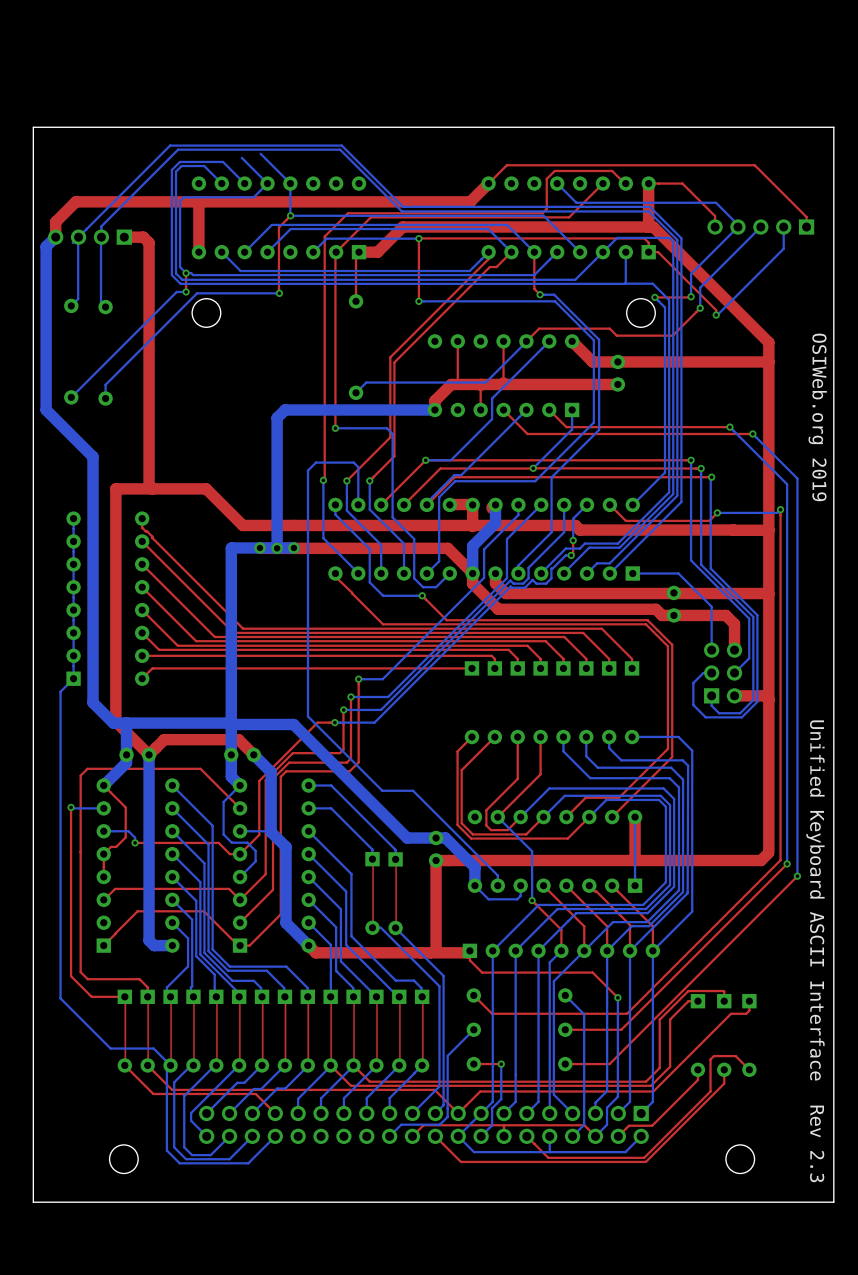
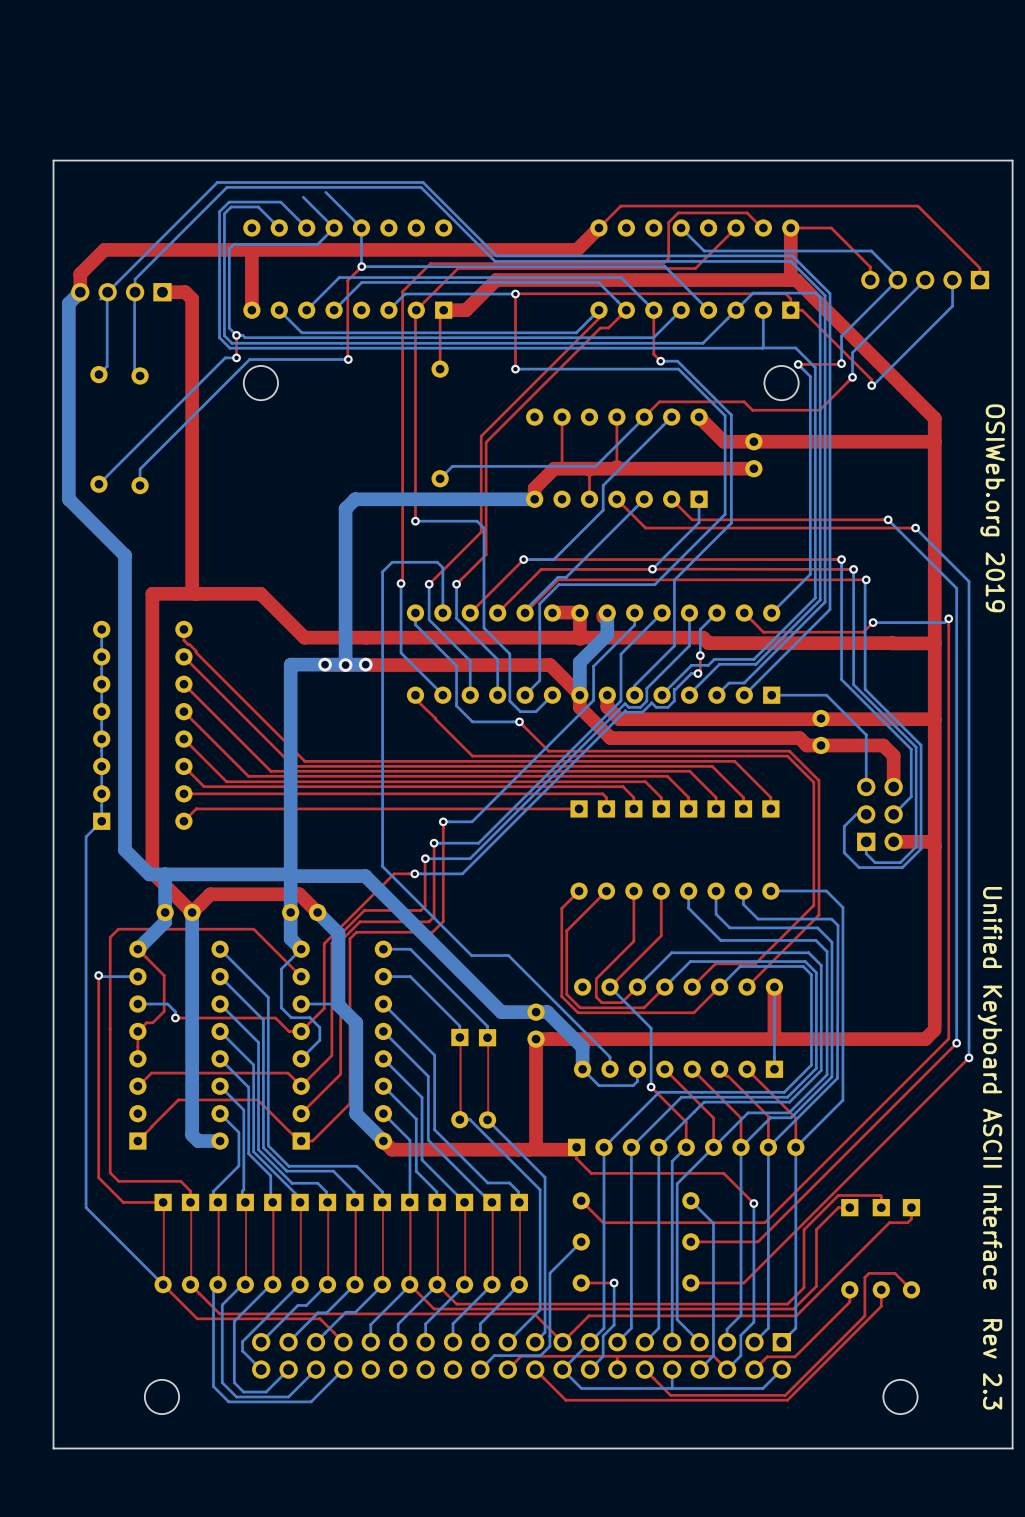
bottom track: (60, 998) (110, 1048) (153, 1048) (170, 1065) -> (86, 1204) (86, 1207) (163, 1284)

